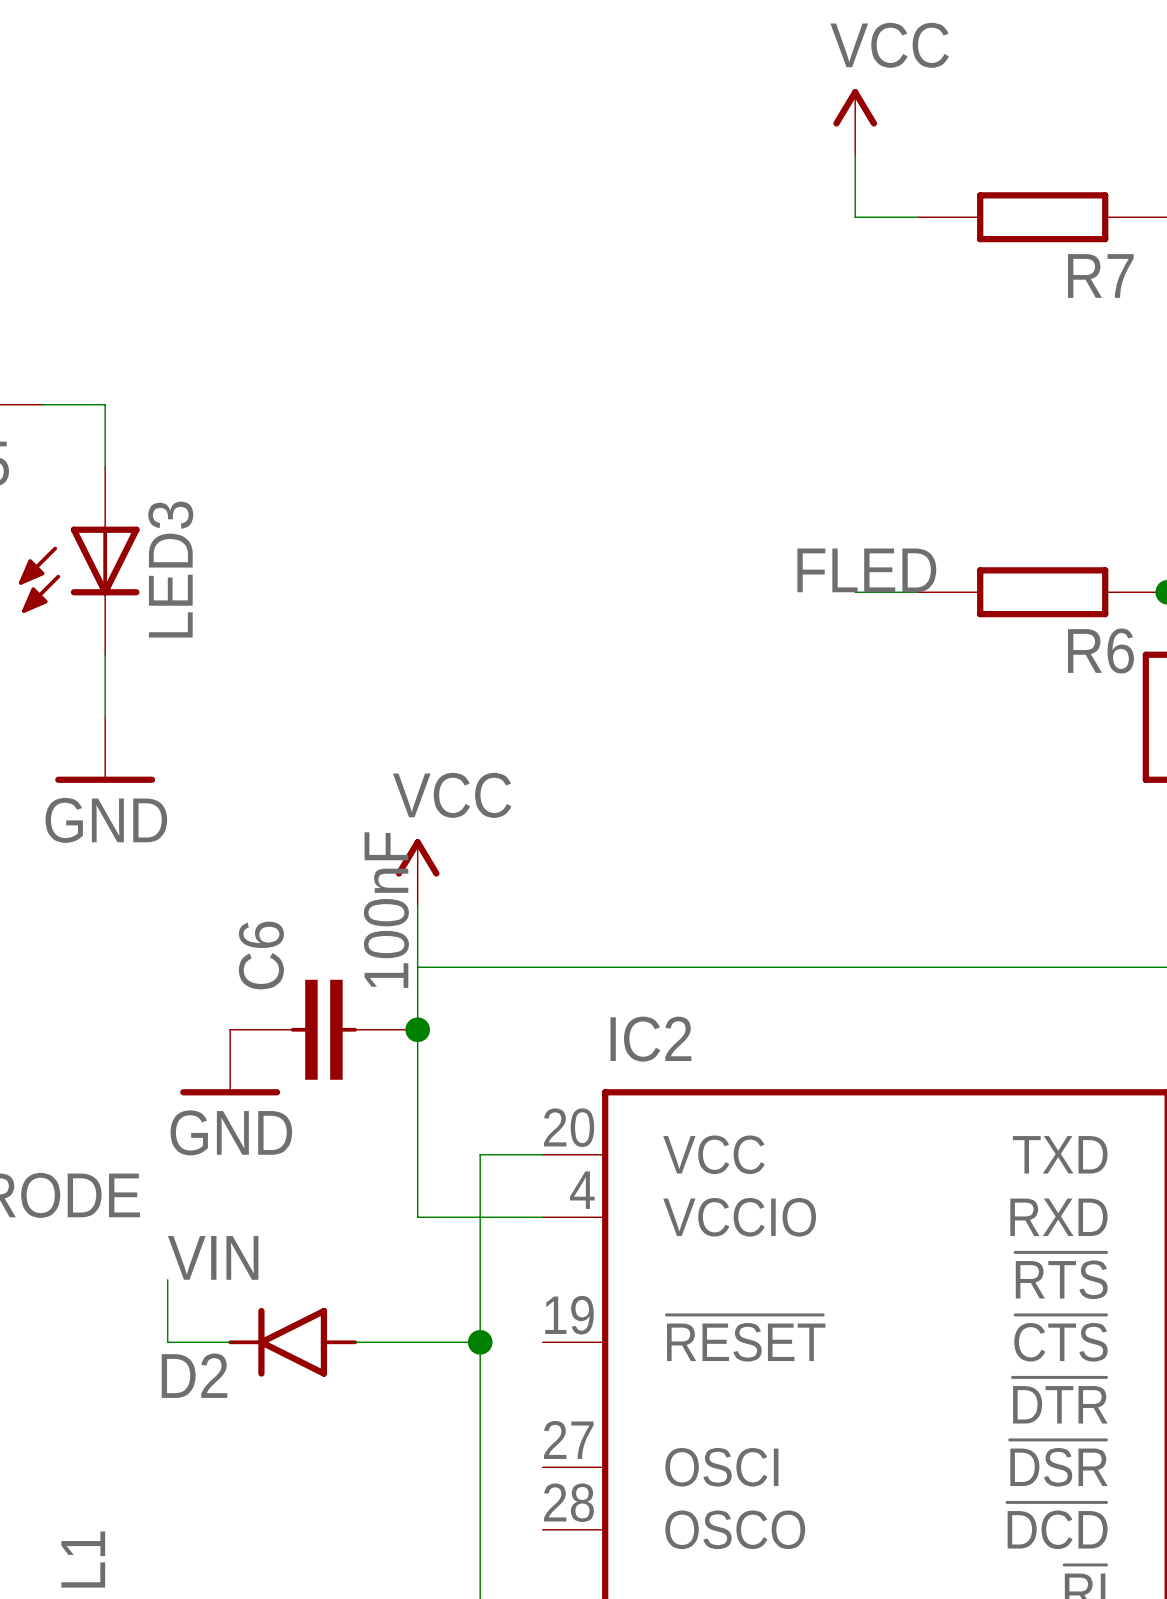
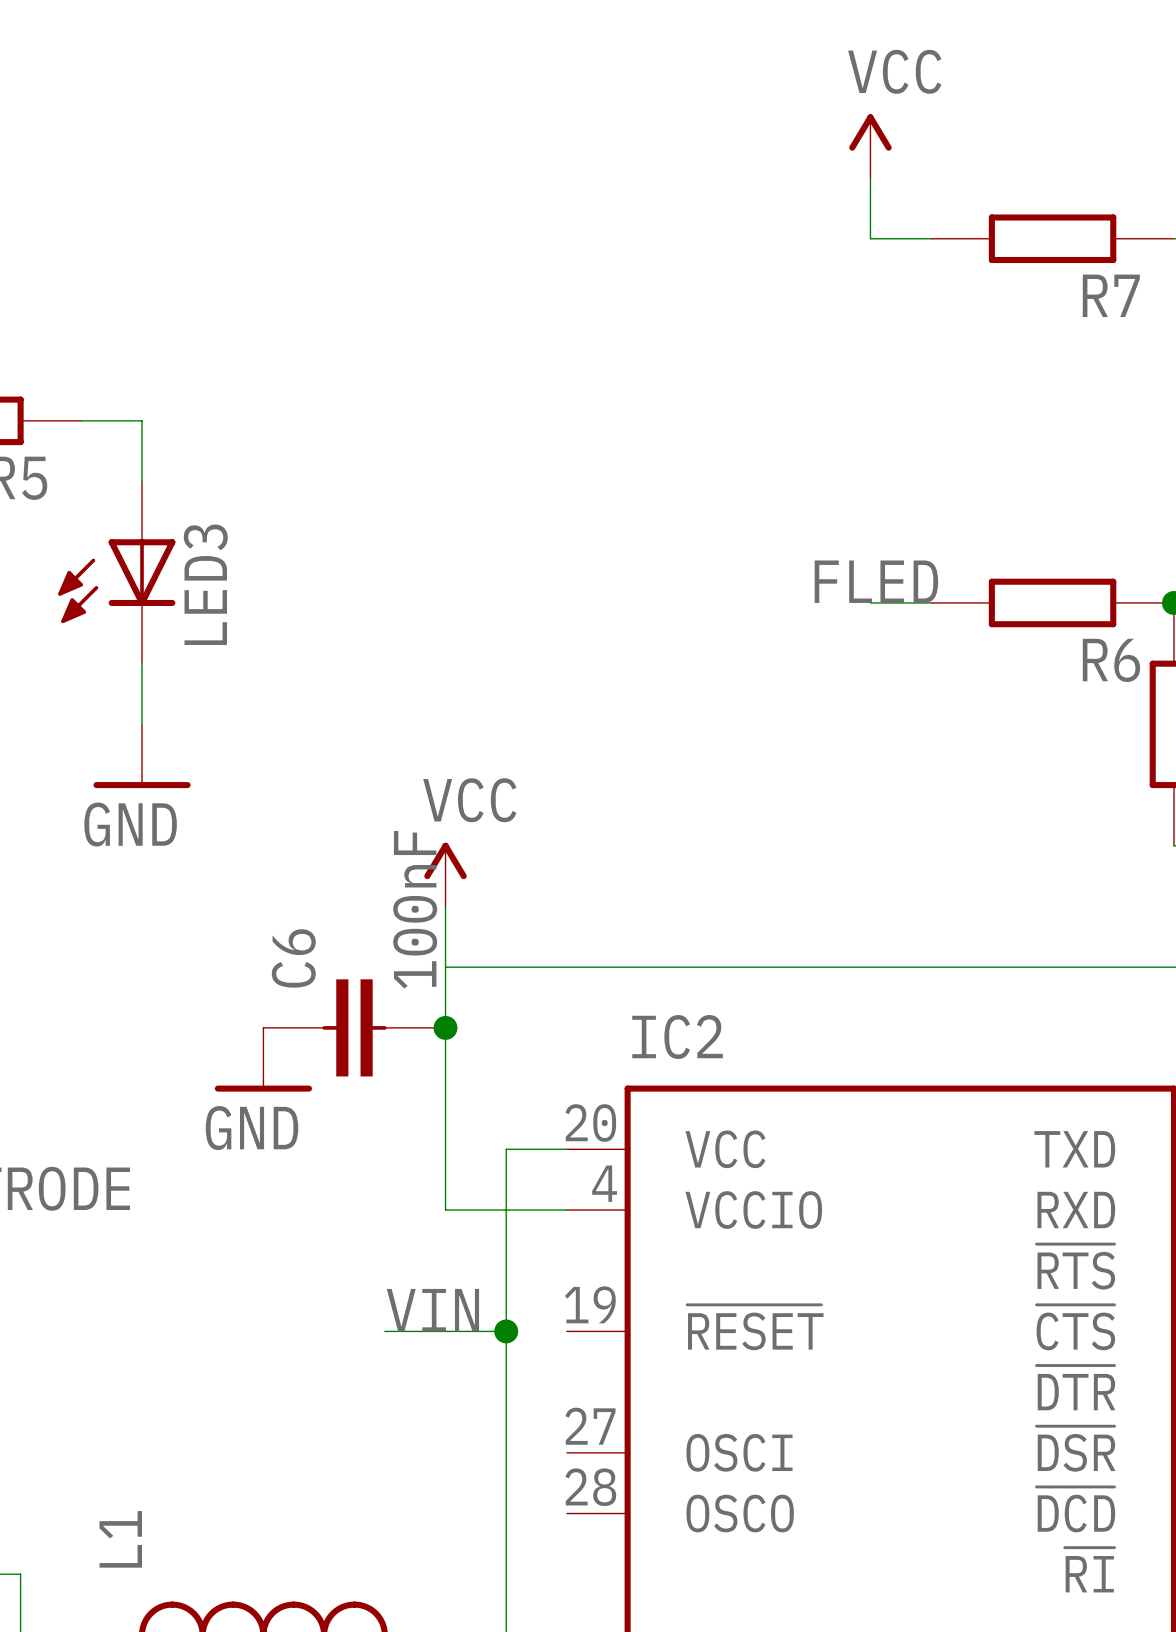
label position: VIN (213, 1257) -> VIN (432, 1310)
wire: (167, 1279) (167, 1342) (230, 1342) -> none
D2: (292, 1342) -> none

